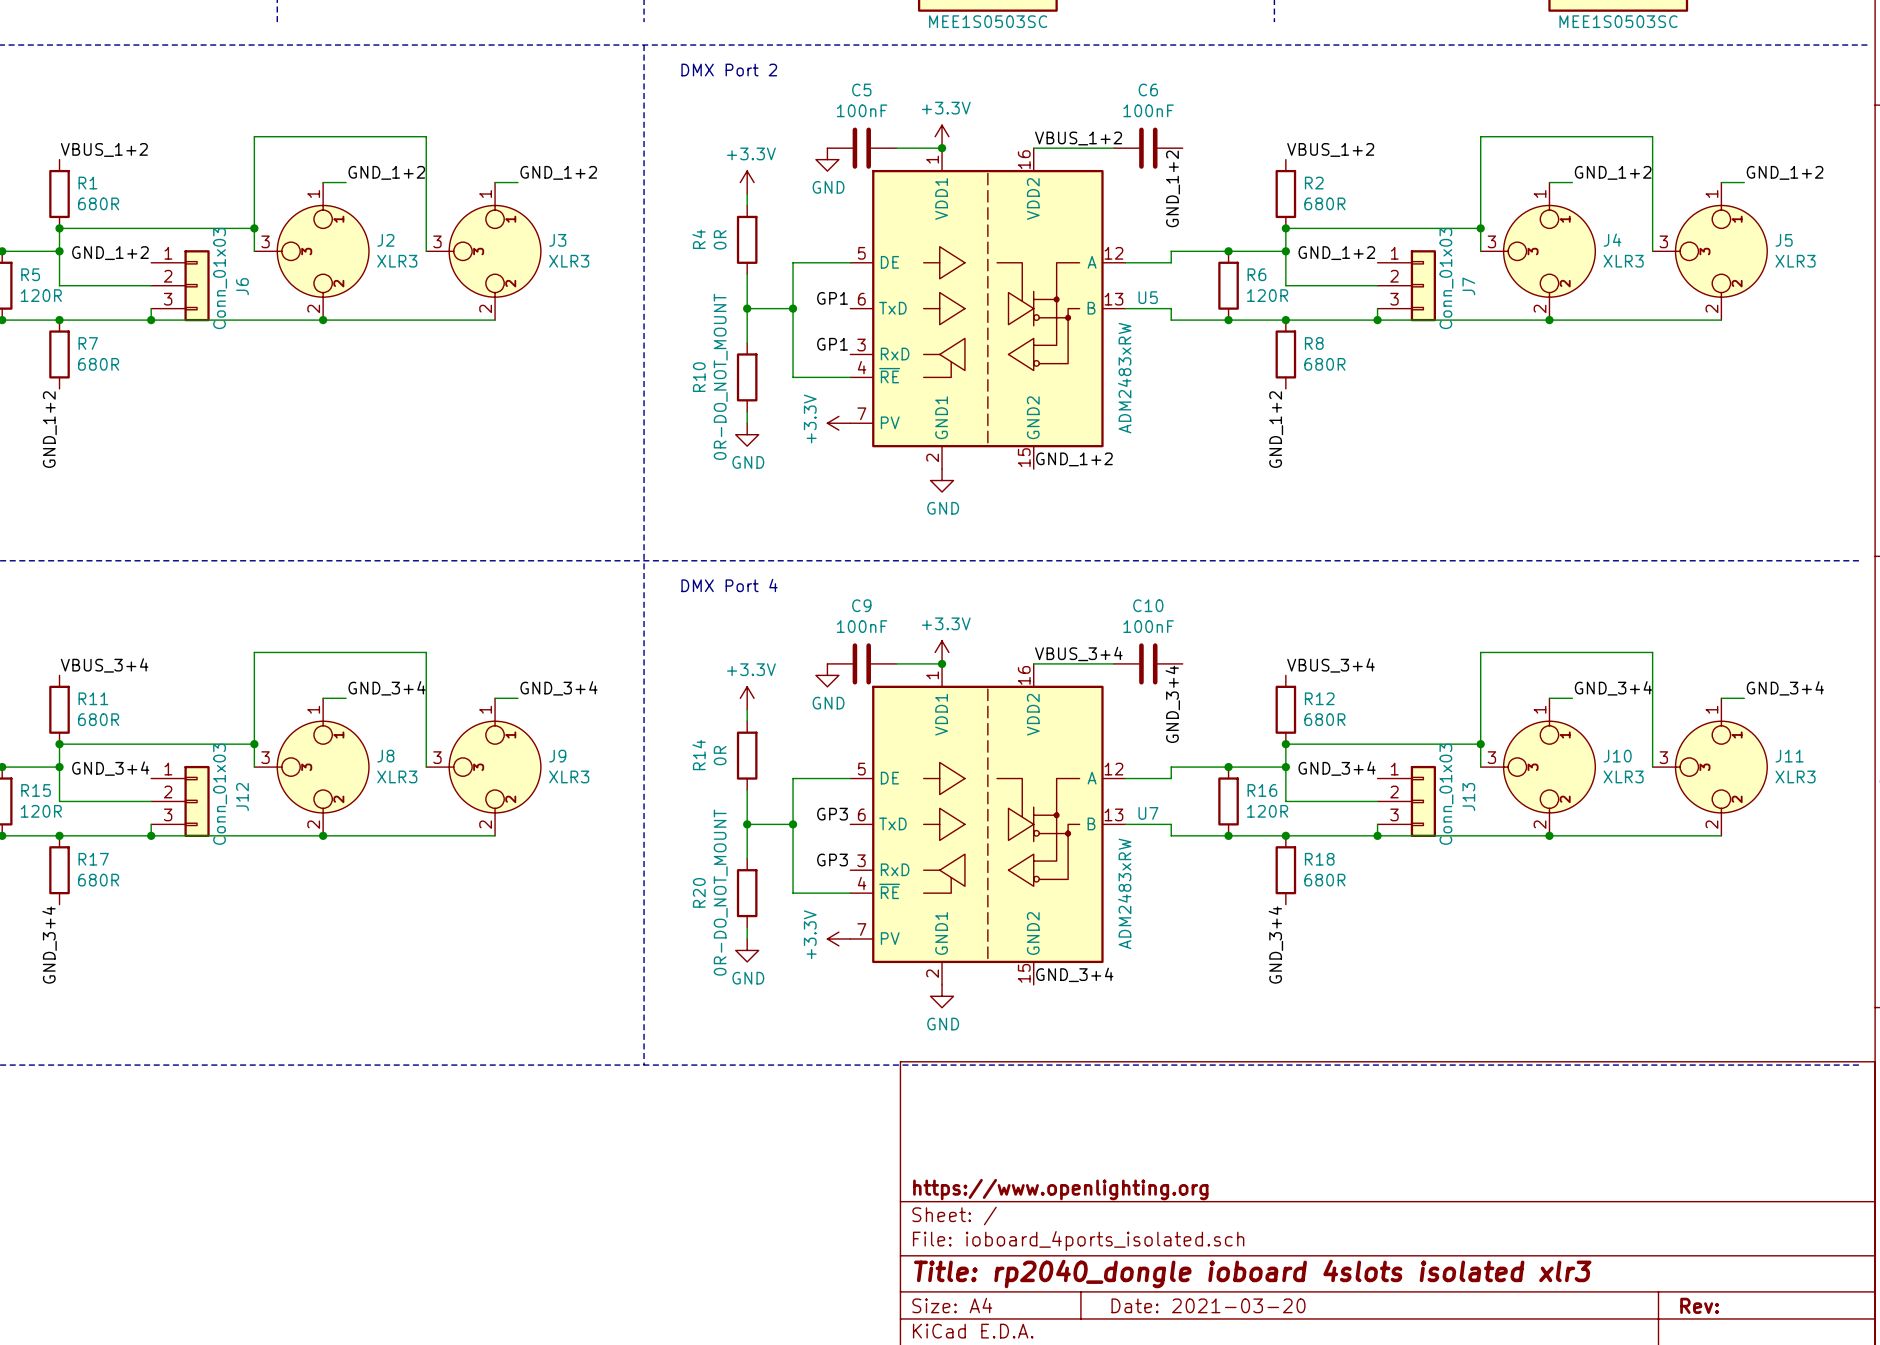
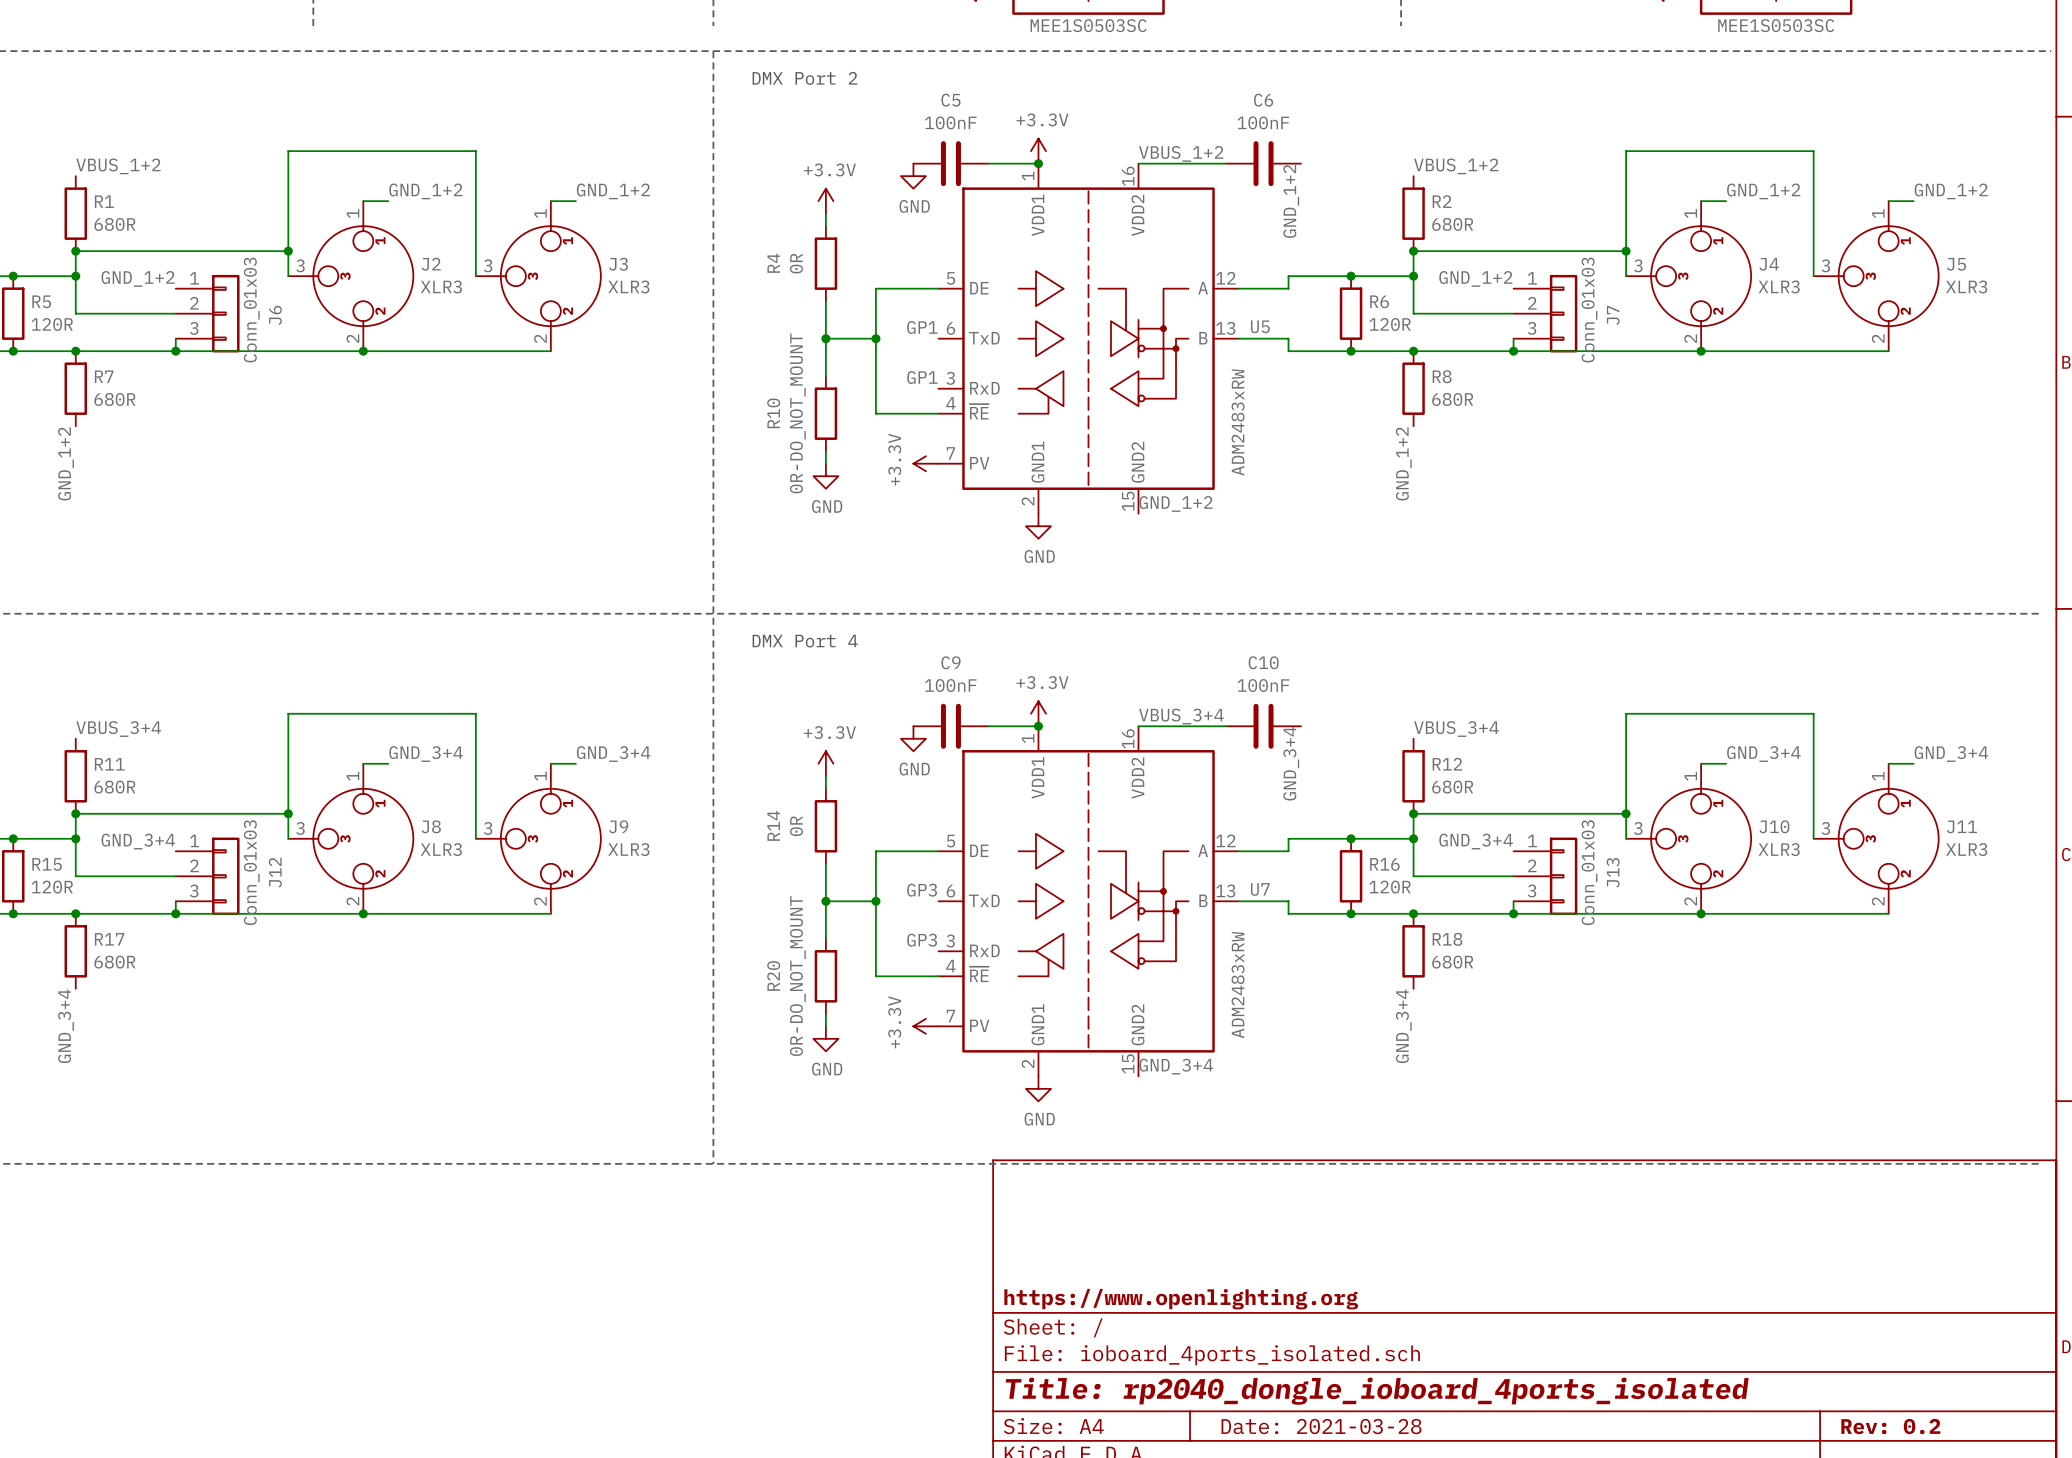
title block: Title: rp2040_dongle ioboard 4slots isolated xlr3 (1252, 1273) -> Title: rp2040_dongle_ioboard_4ports_isolated (1377, 1391)
title block: Date: 2021-03-20 (1208, 1305) -> Date: 2021-03-28 (1321, 1426)
title block: Rev: (1699, 1305) -> Rev: 0.2 (1890, 1426)

